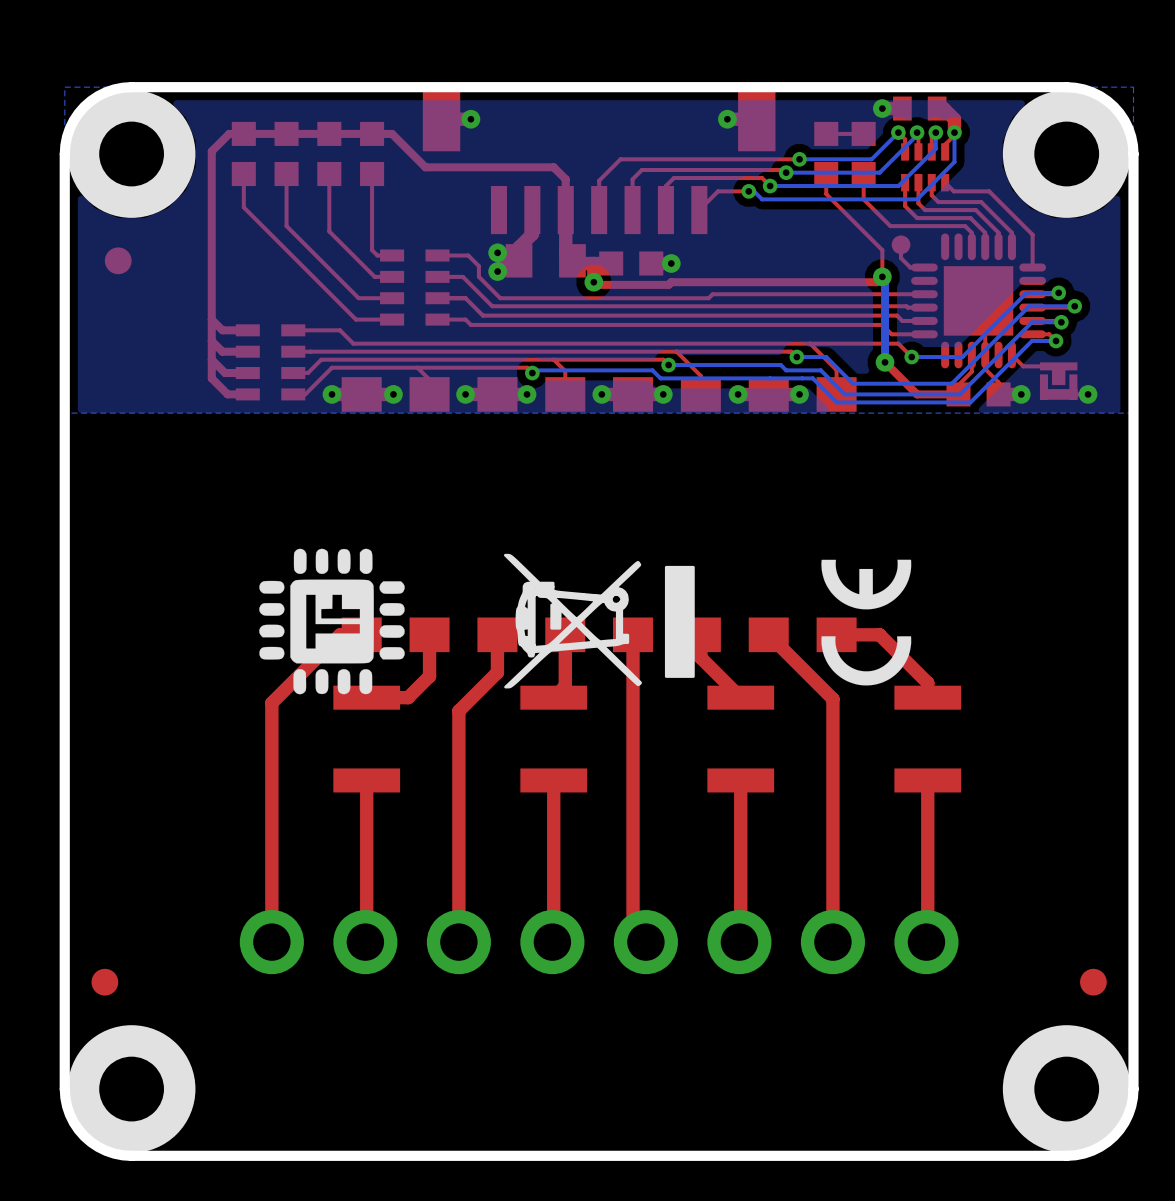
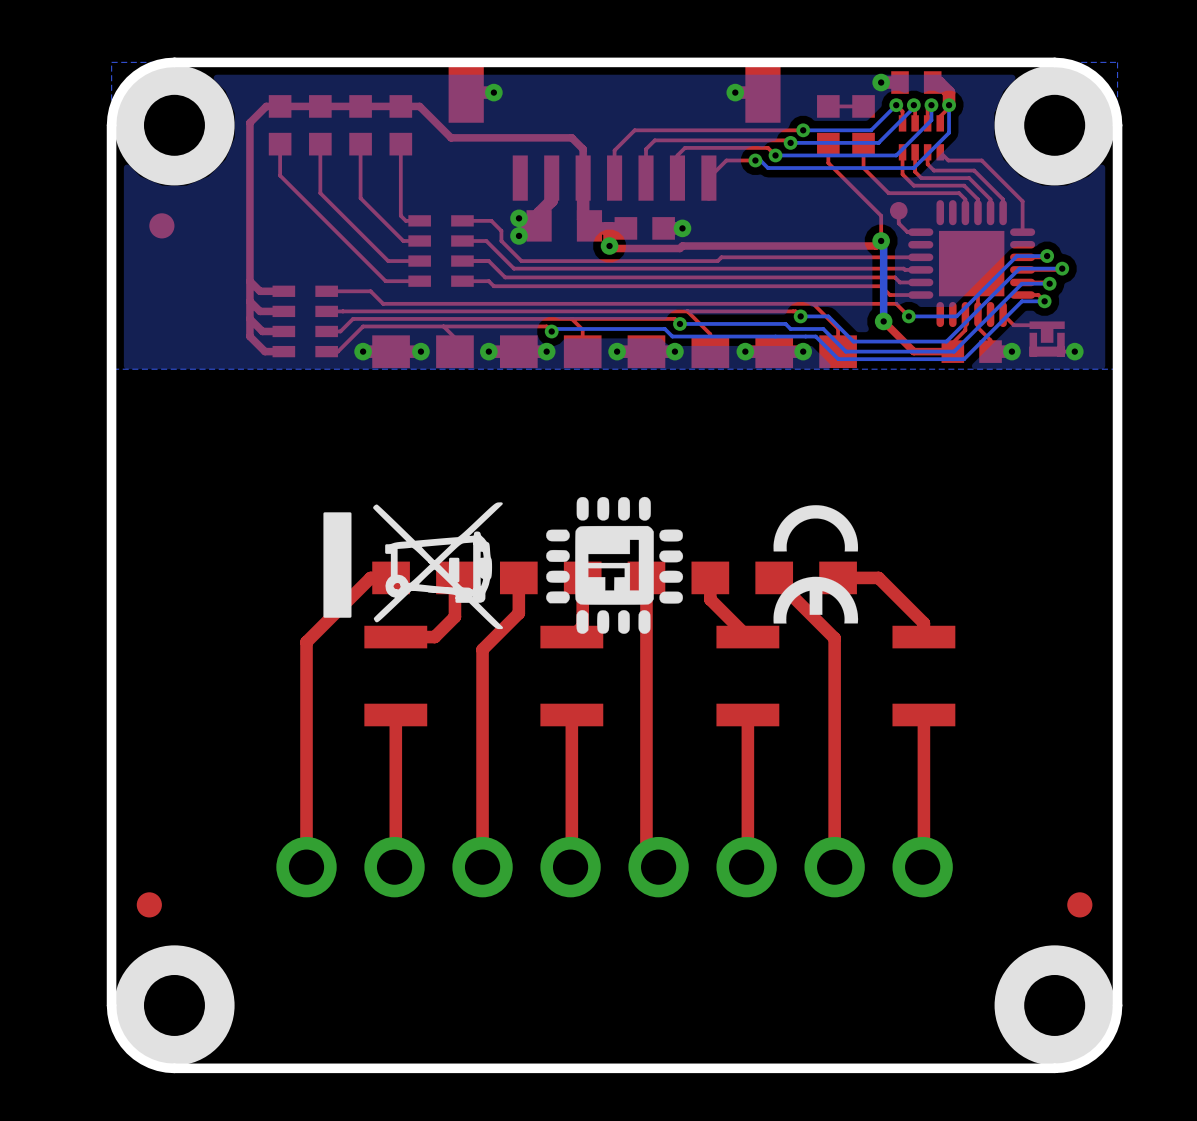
drawing: [259, 548, 405, 695] -> none
drawing shape: [503, 553, 695, 689] -> [546, 496, 684, 634]
drawing: none -> [323, 502, 504, 630]
drawing: none -> [773, 505, 859, 624]
drawing: [821, 559, 912, 686] -> none

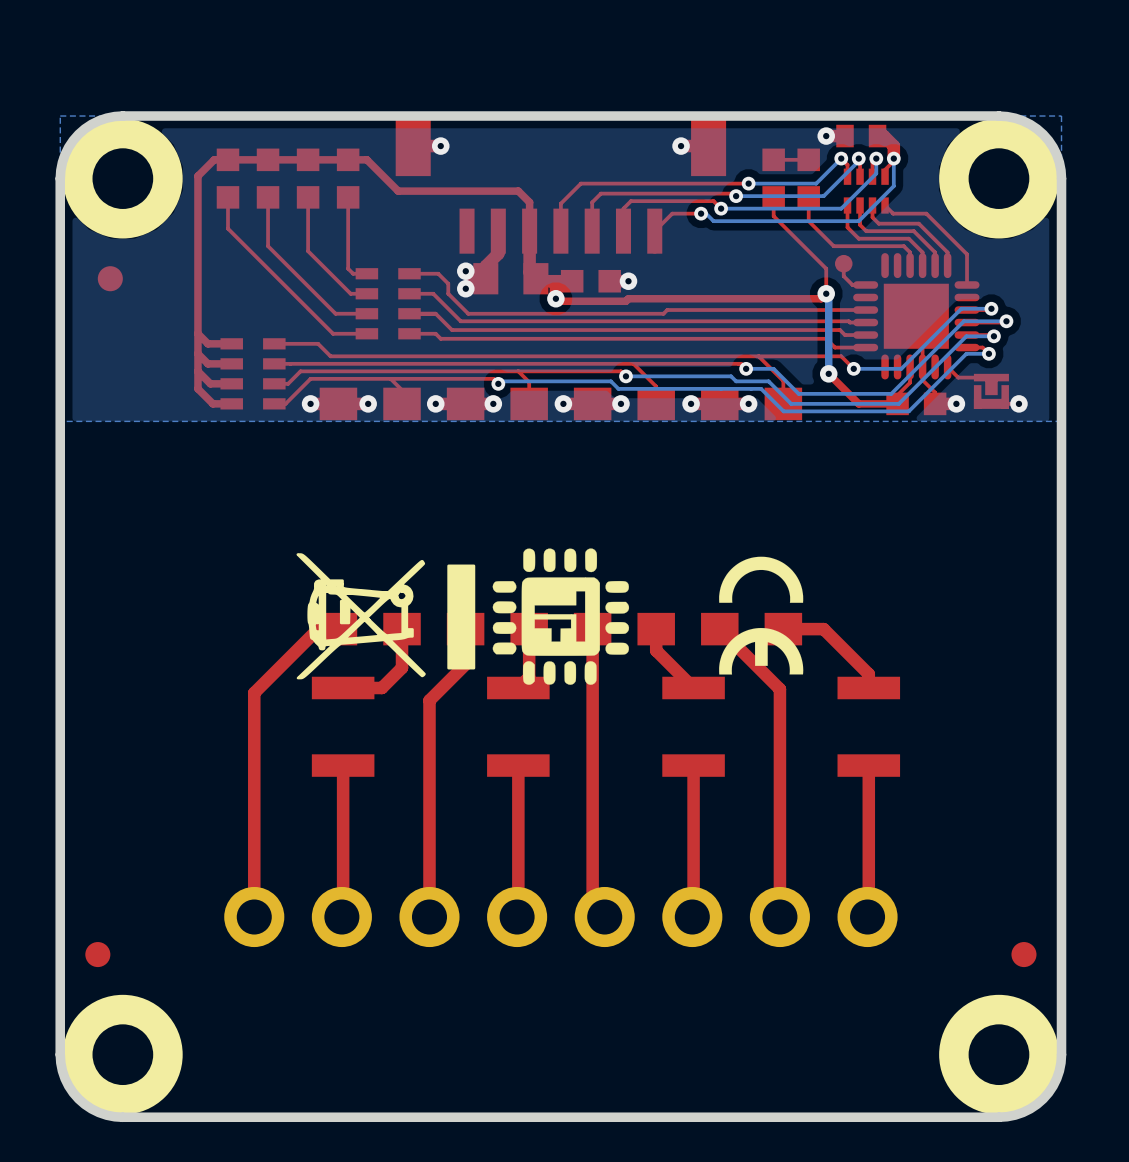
drawing: none -> [296, 553, 476, 680]
drawing: [323, 502, 504, 630] -> none

